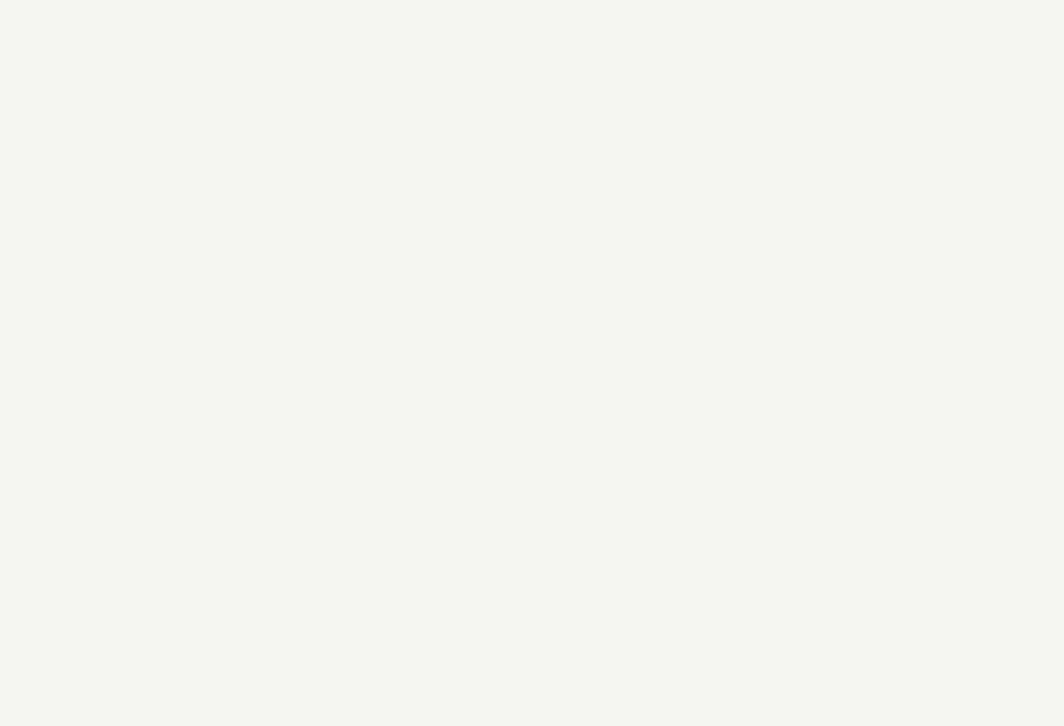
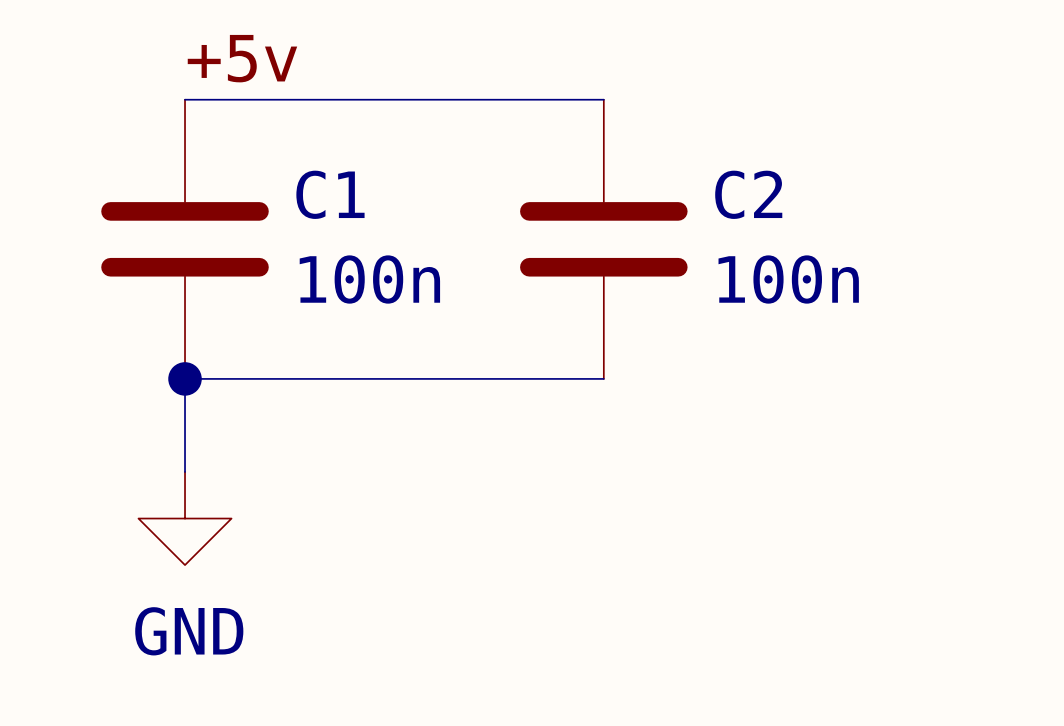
label: none -> +5v (242, 58)
wire: none -> (185, 99) (603, 99)
C1: none -> 100n (185, 239)
C2: none -> 100n (603, 239)
junction: none -> (185, 378)
wire: none -> (603, 378) (185, 378) (185, 472)
power symbol: none -> GND (185, 518)

